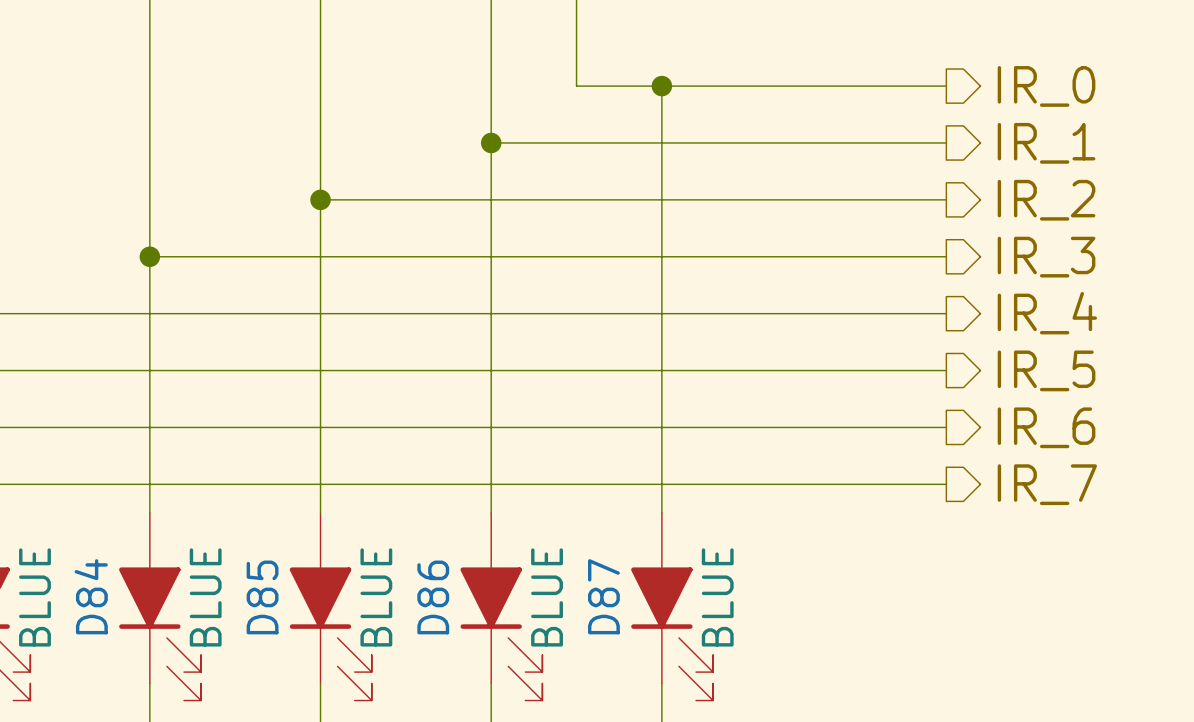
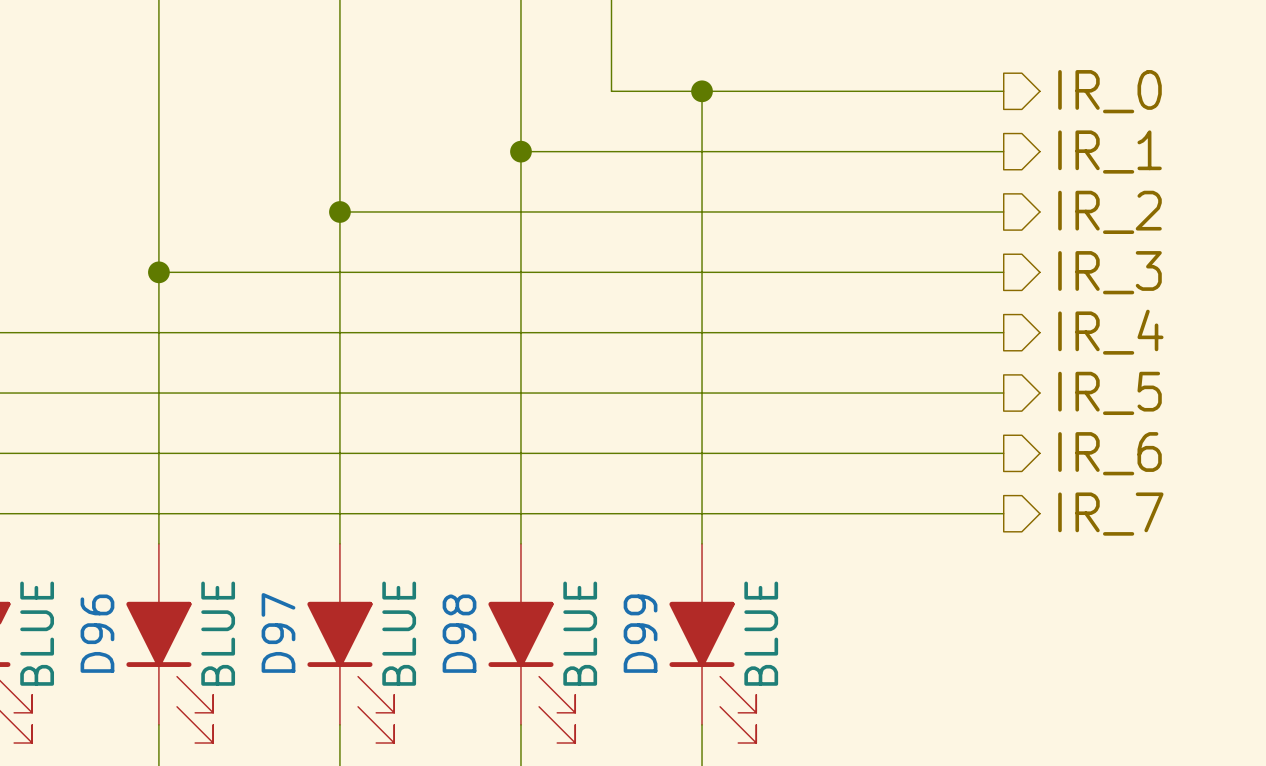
D84 name: D84 (91, 596) -> D96 (97, 633)
D87 name: D87 (603, 596) -> D99 (640, 633)
D85 name: D85 (262, 597) -> D97 (278, 632)
D86 name: D86 (433, 597) -> D98 (459, 633)

